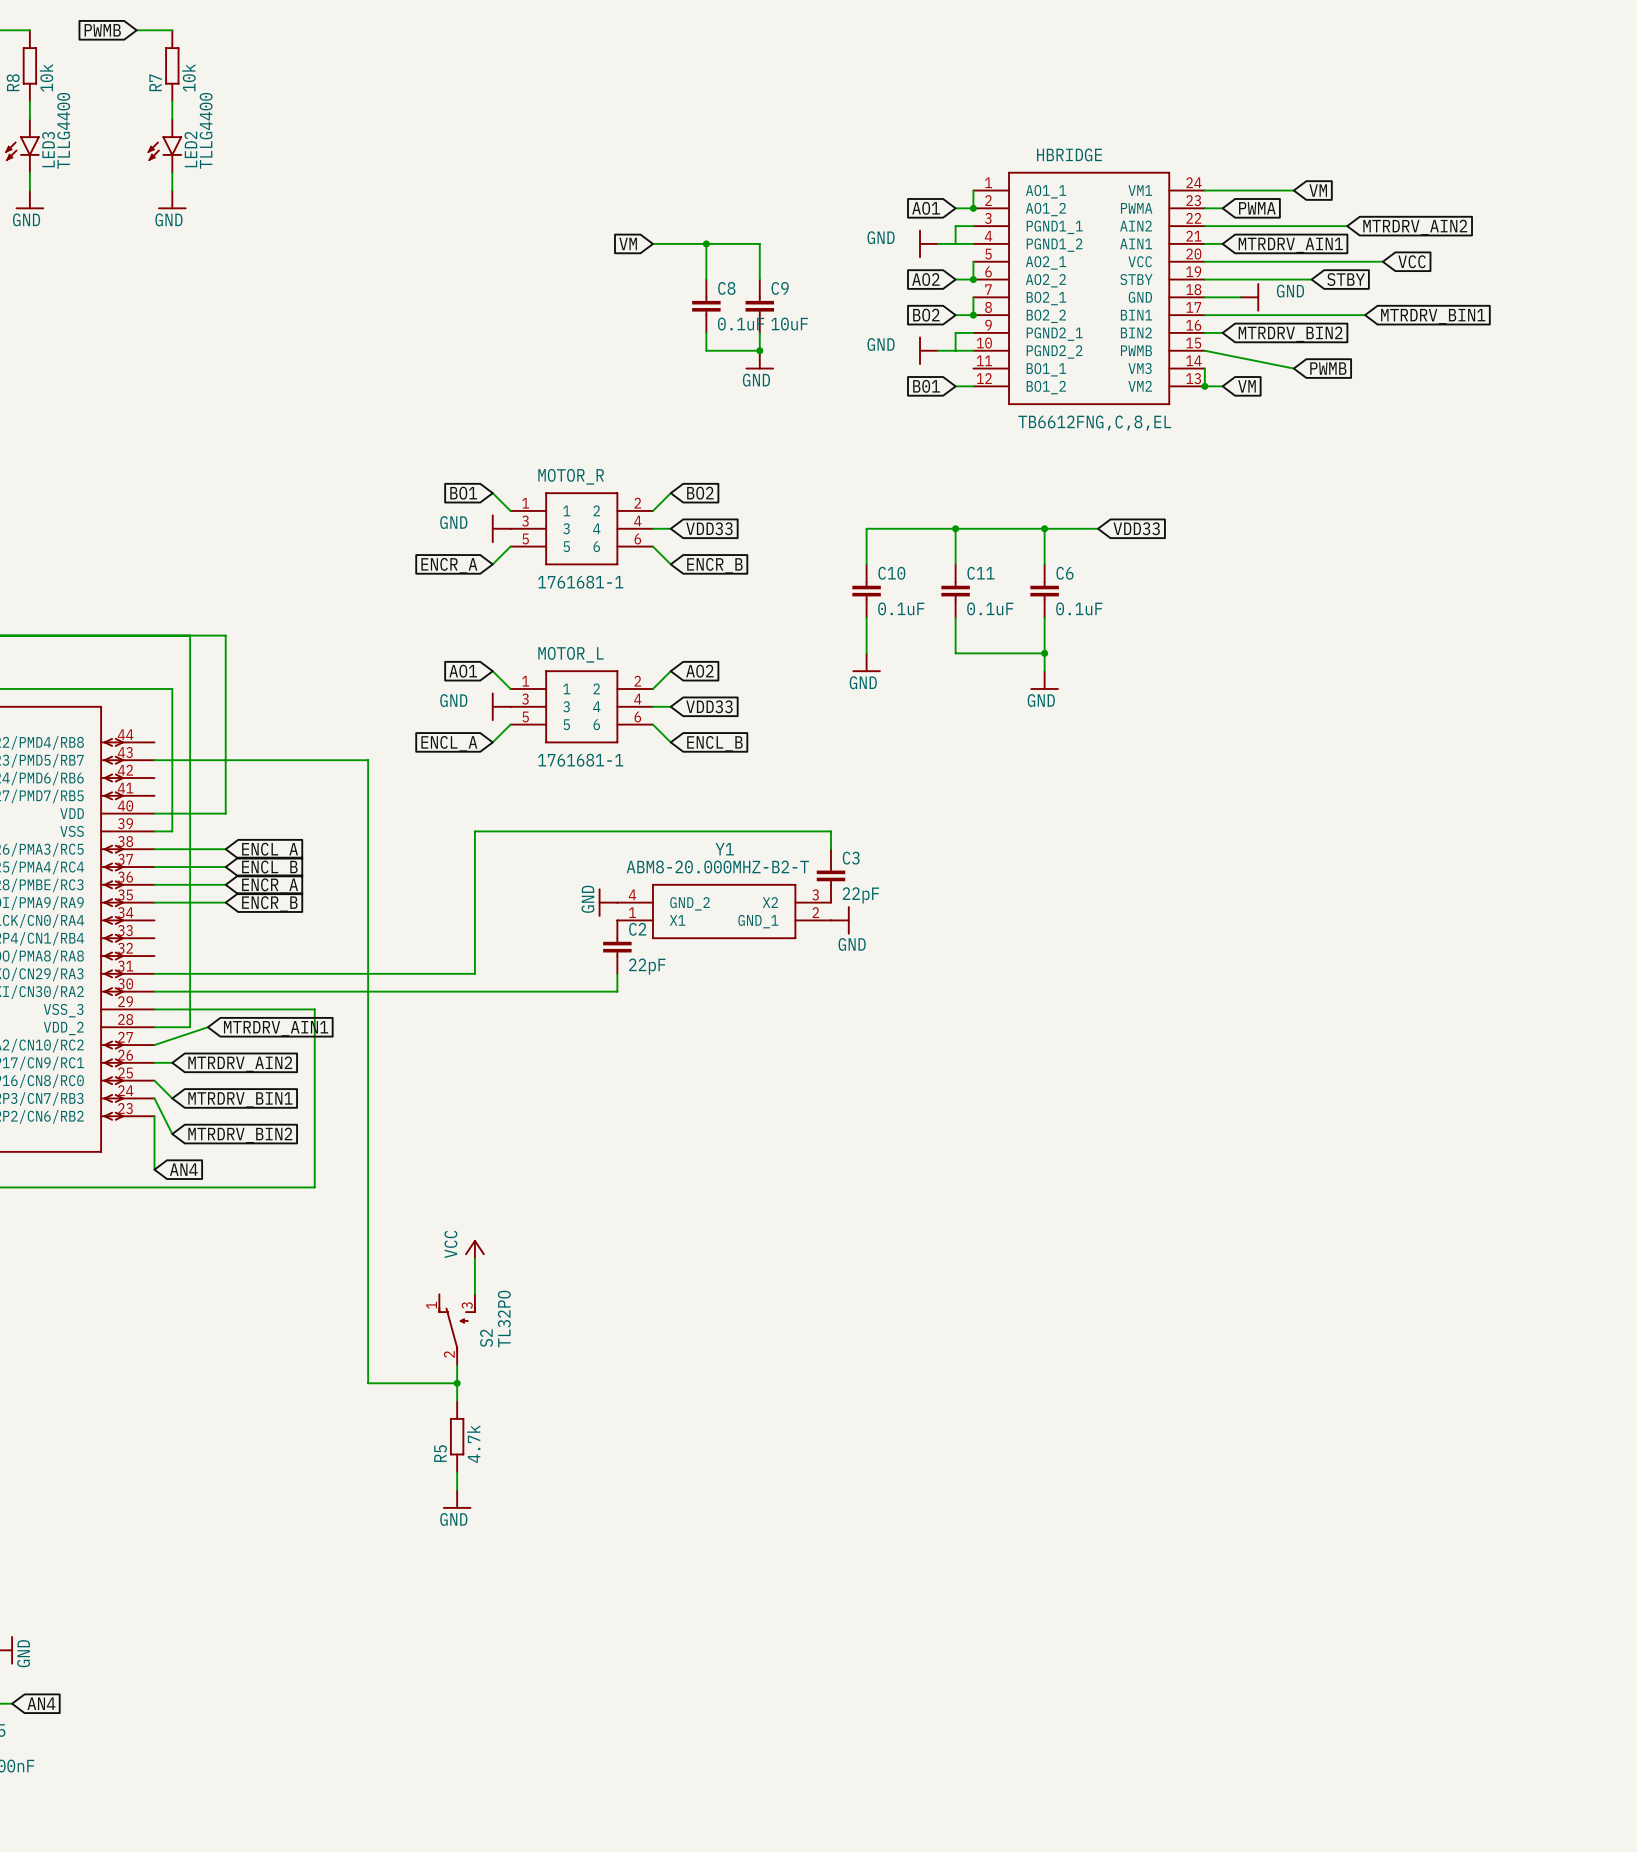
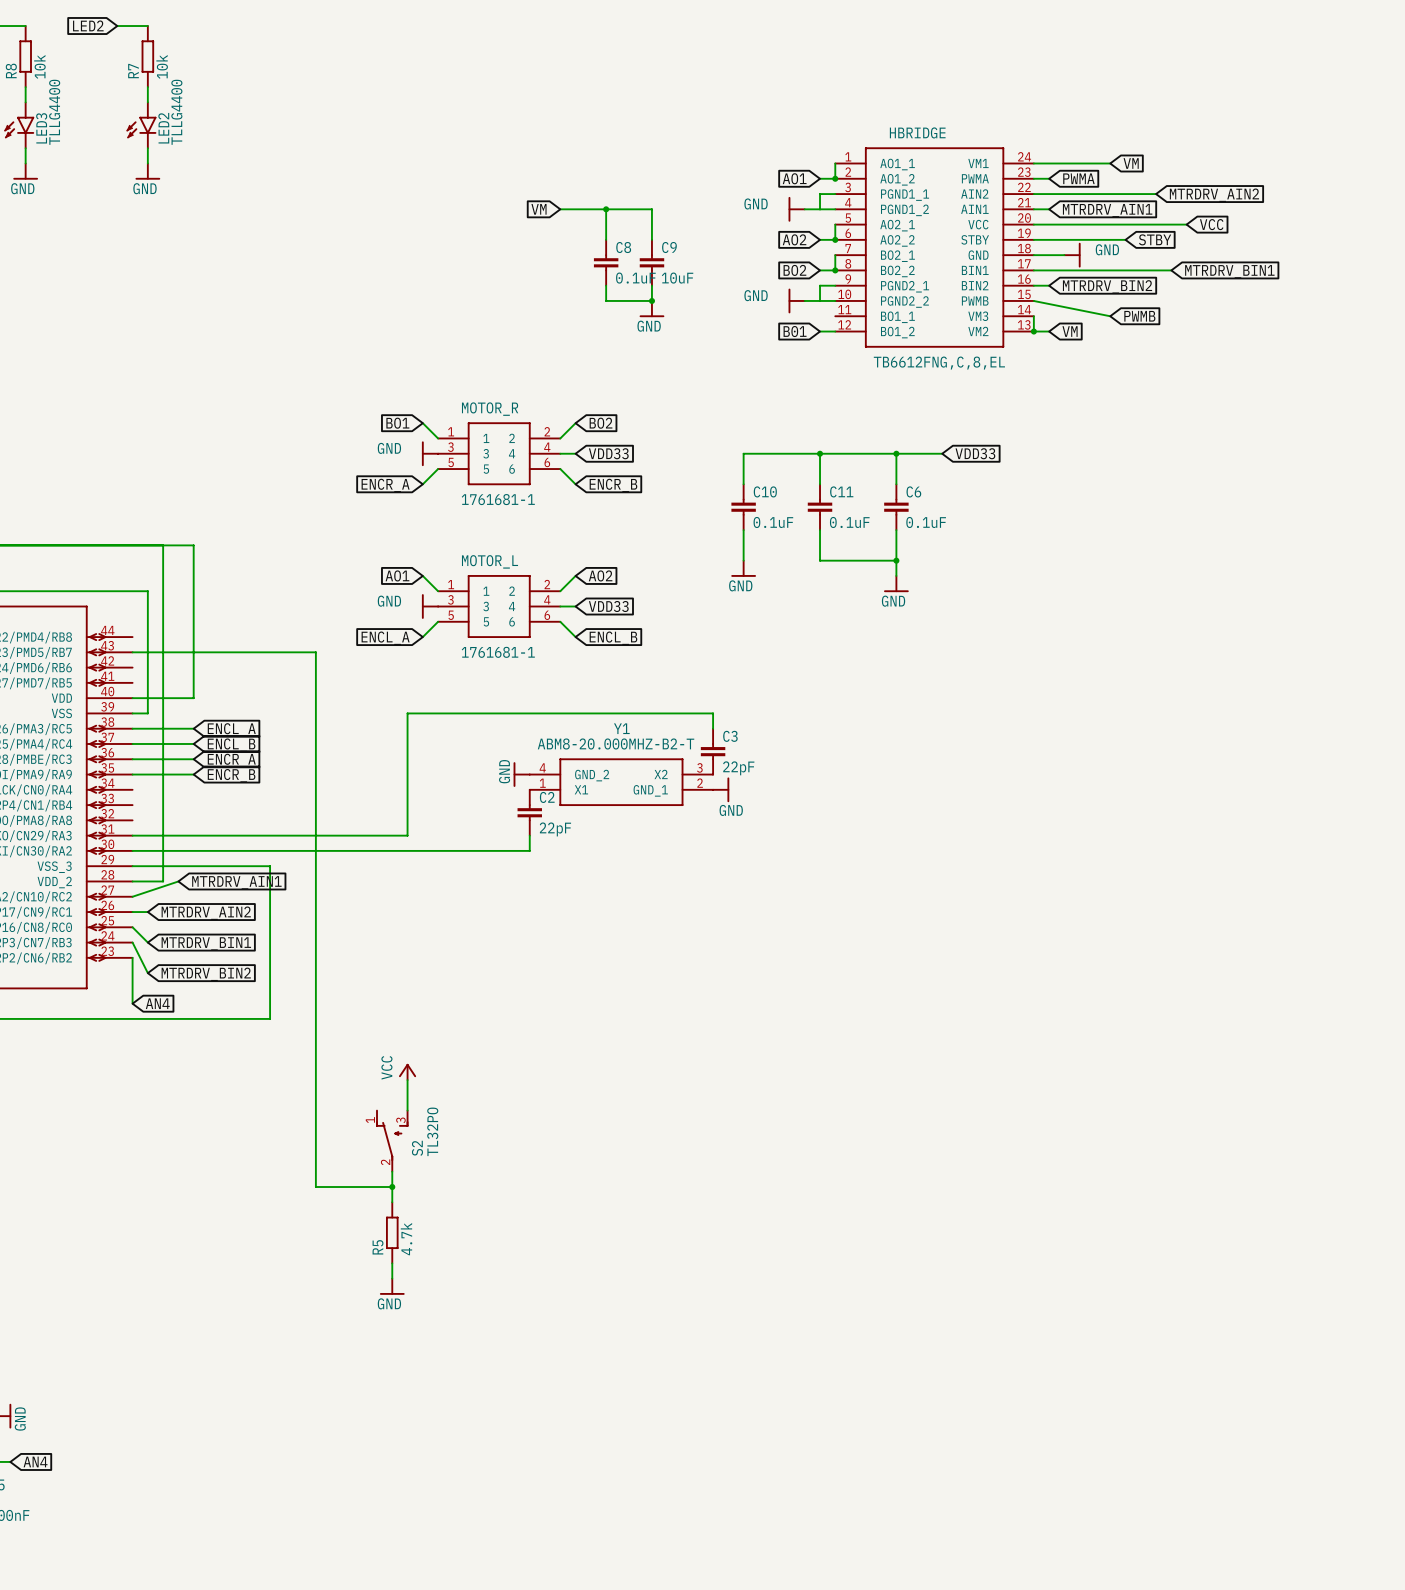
global label: PWMB (102, 30) -> LED2 (88, 25)

